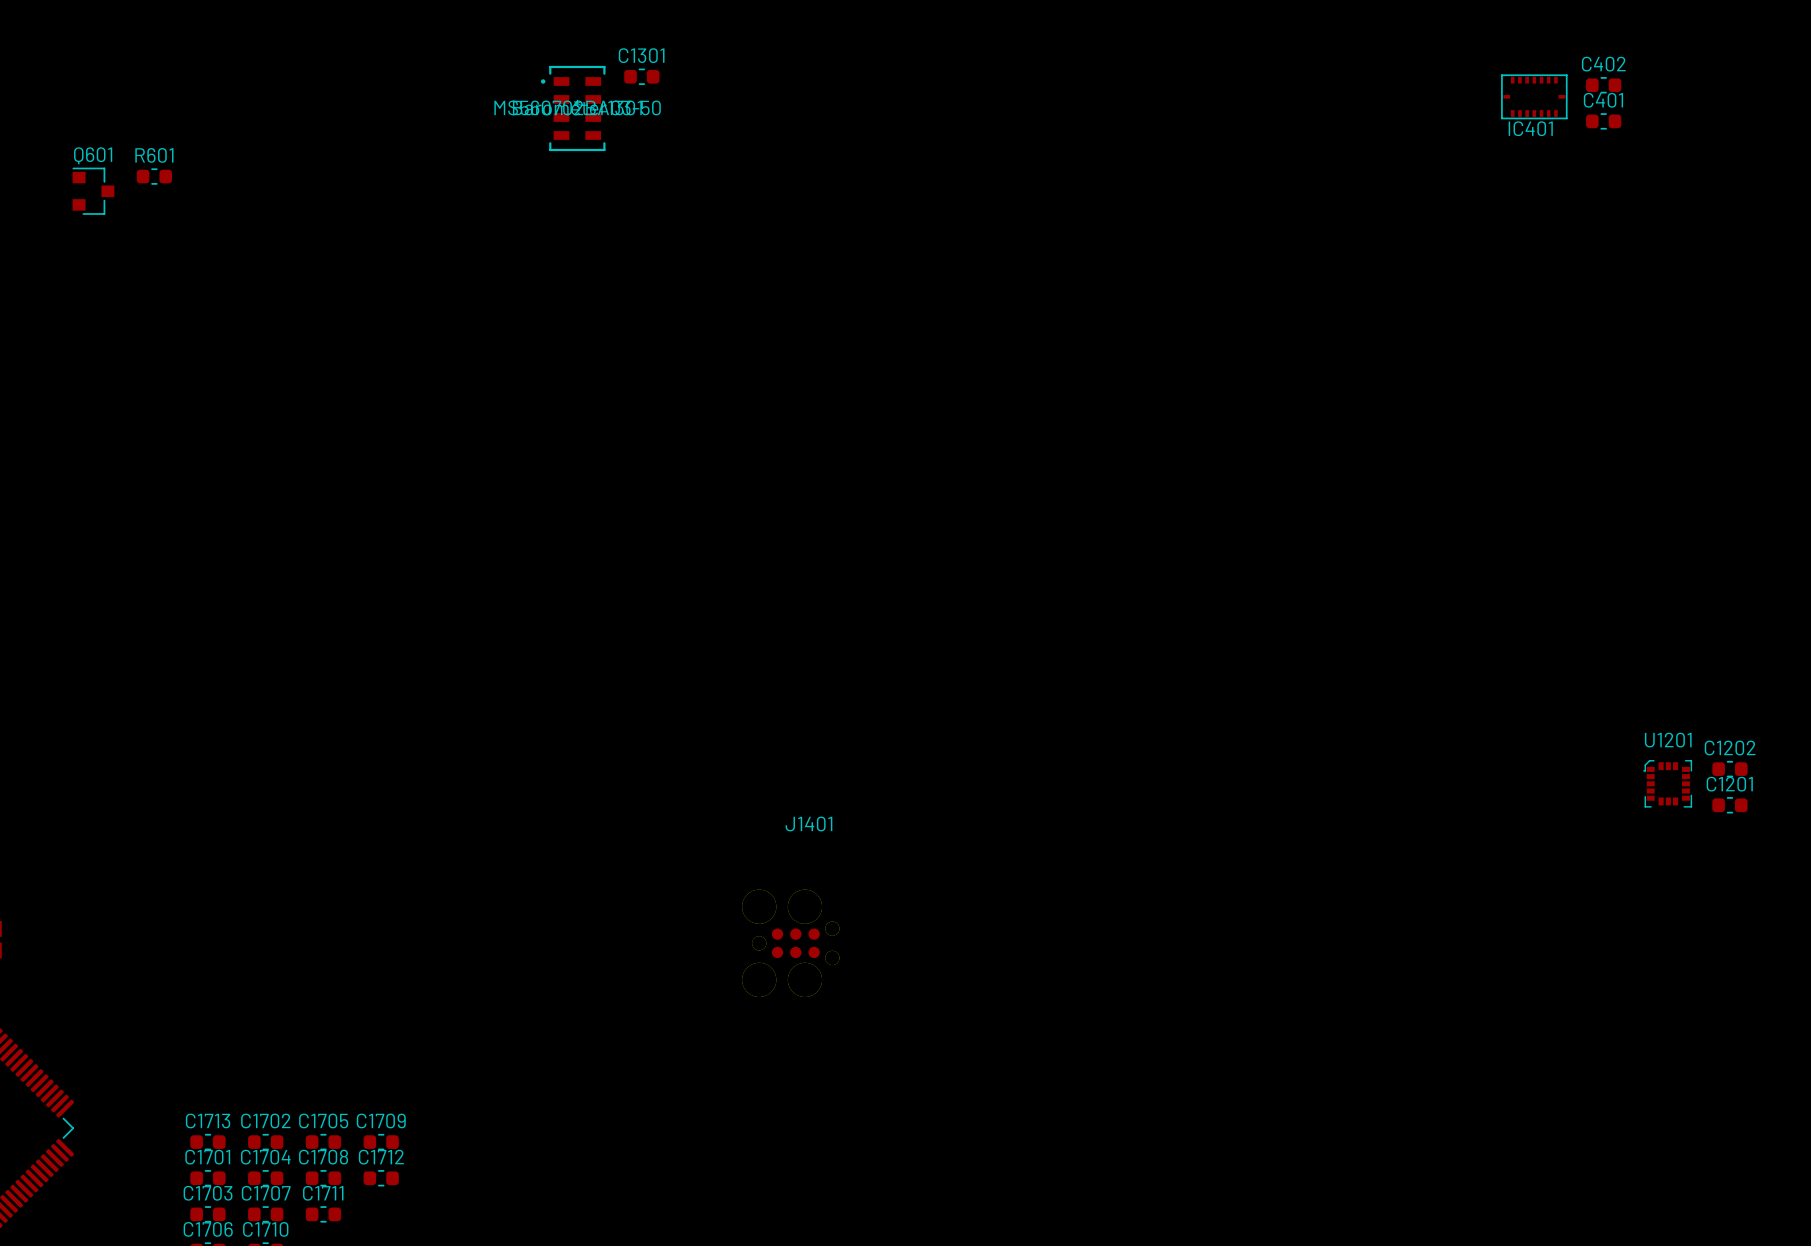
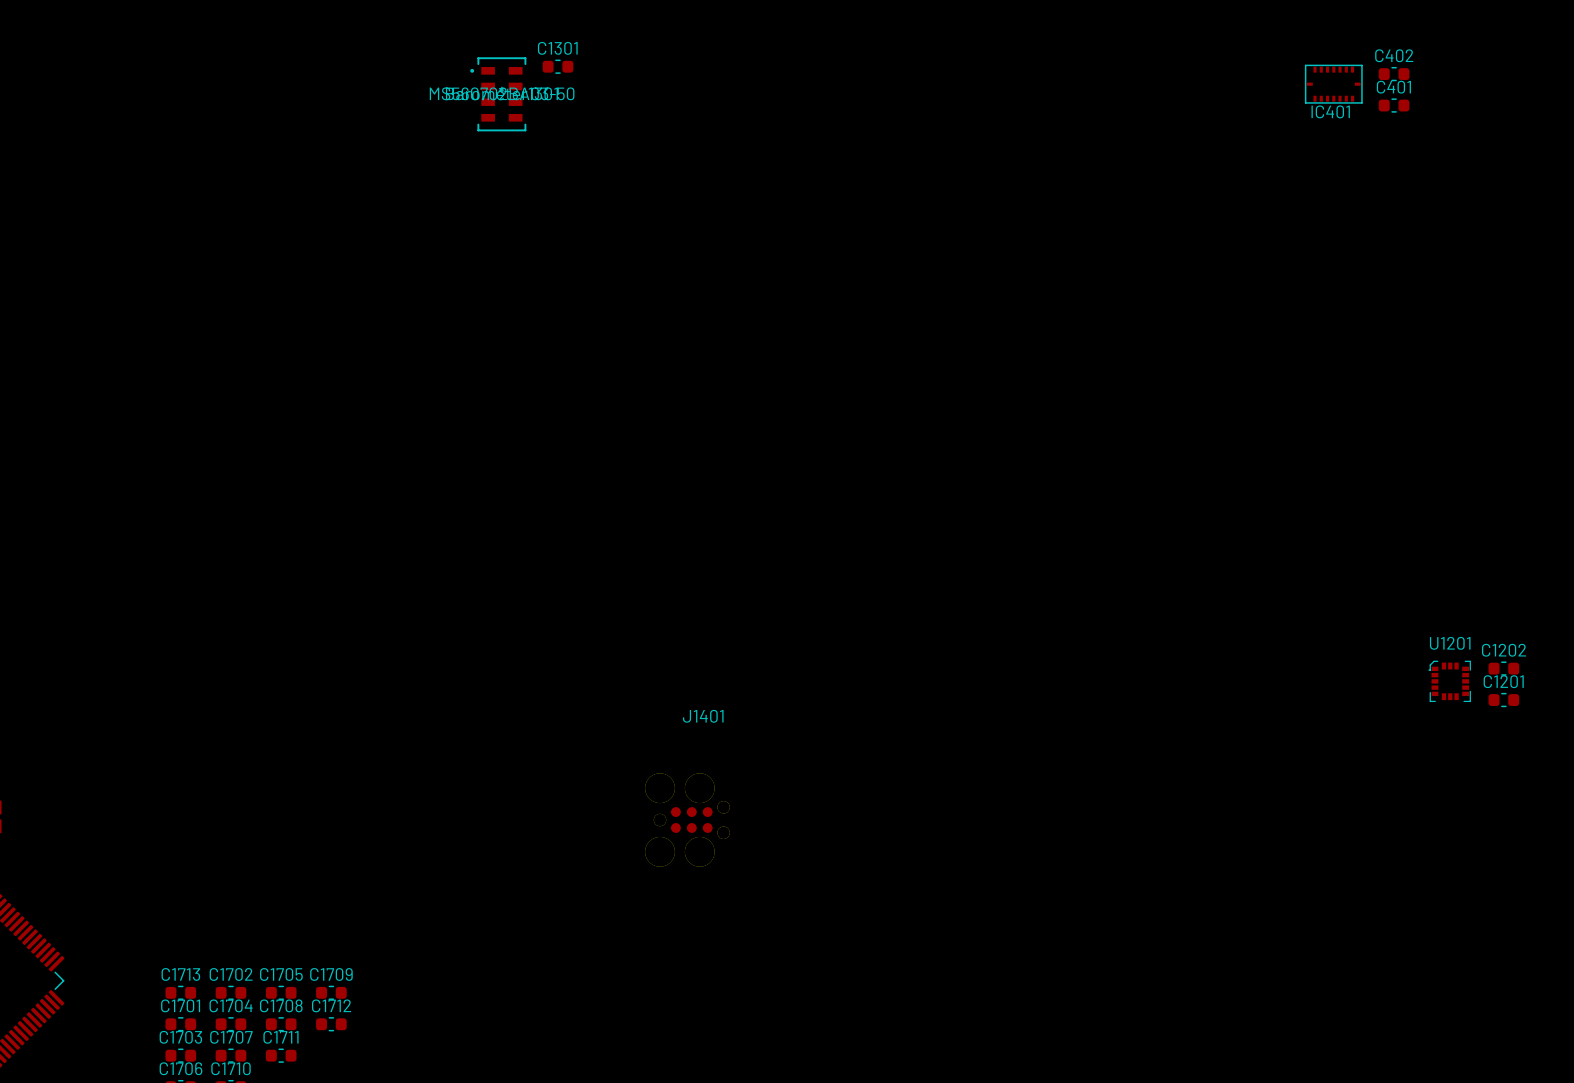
R601: (154, 176) -> none
Q601: (93, 191) -> none

